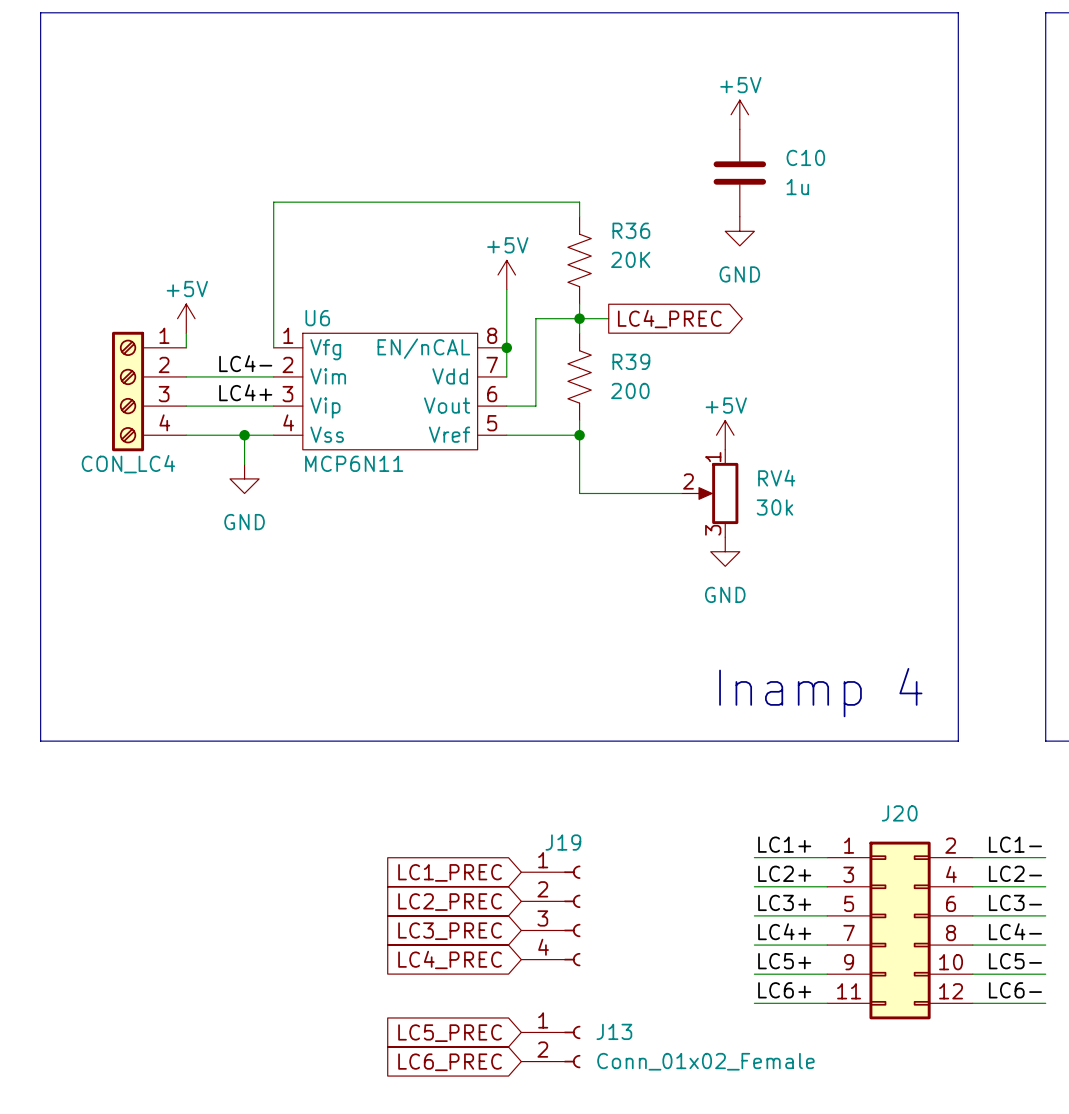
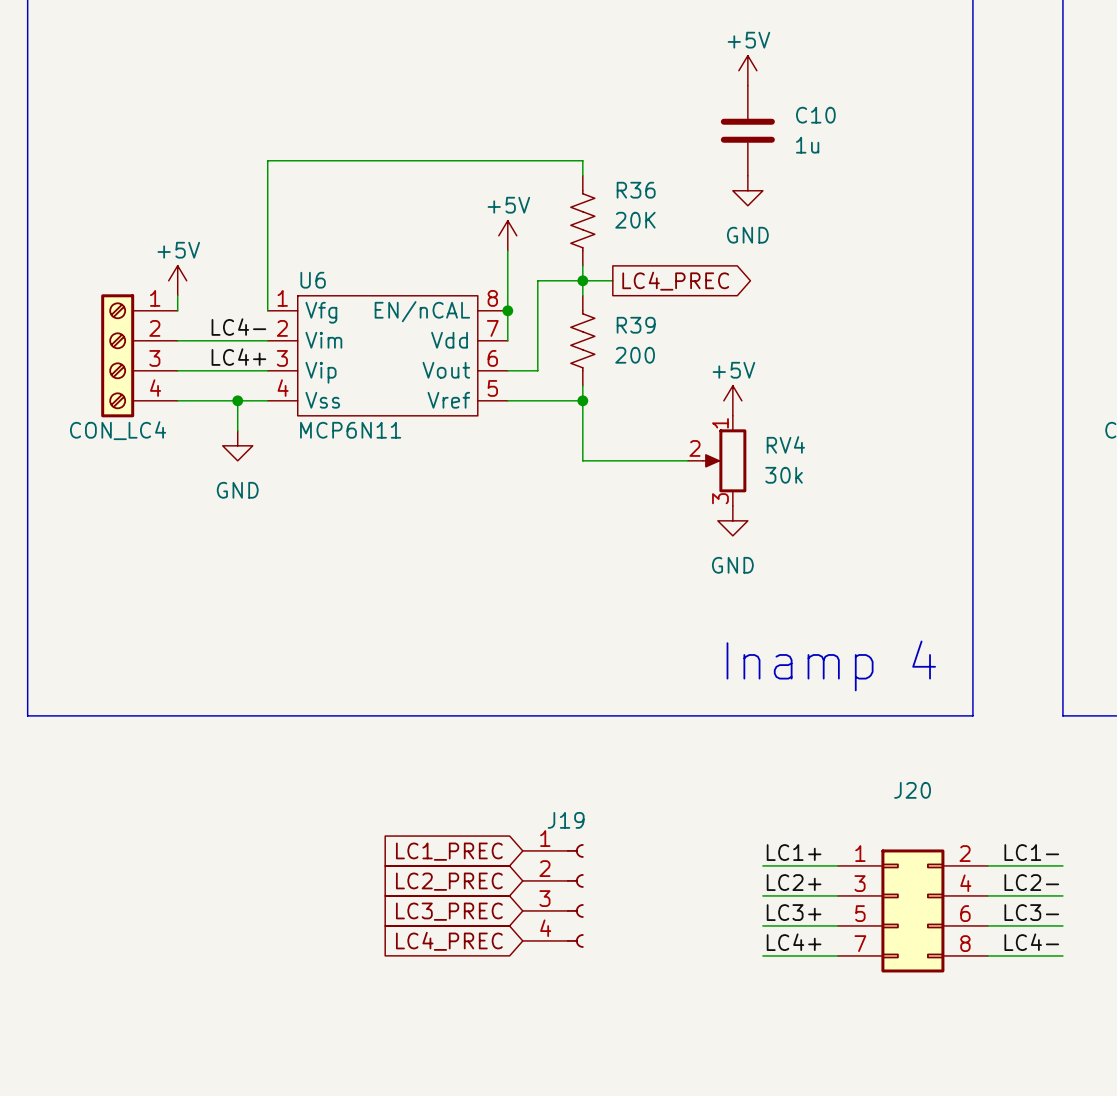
J20 symbol: [827, 841, 973, 1020] -> [837, 849, 988, 973]
label: LC1+ (784, 844) -> none
label: LC1- (1015, 844) -> none
wire: (754, 857) (827, 857) -> none
wire: (972, 857) (1045, 857) -> none
label: LC2+ (784, 873) -> LC1+ (794, 852)
label: LC2- (1015, 873) -> LC1- (1031, 852)
label: LC3+ (784, 902) -> LC2+ (794, 882)
label: LC3- (1015, 902) -> LC2- (1031, 882)
label: LC4+ (784, 931) -> LC3+ (794, 912)
label: LC4- (1015, 931) -> LC3- (1031, 912)
label: LC5+ (784, 961) -> LC4+ (794, 942)
label: LC5- (1015, 961) -> LC4- (1031, 942)
label: LC6+ (784, 990) -> none
label: LC6- (1015, 990) -> none
wire: (754, 1003) (827, 1003) -> none
wire: (972, 1003) (1045, 1003) -> none
global label: LC5_PREC (450, 1033) -> none
J13: Conn_01x02_Female (550, 1047) -> none
global label: LC6_PREC (450, 1062) -> none

